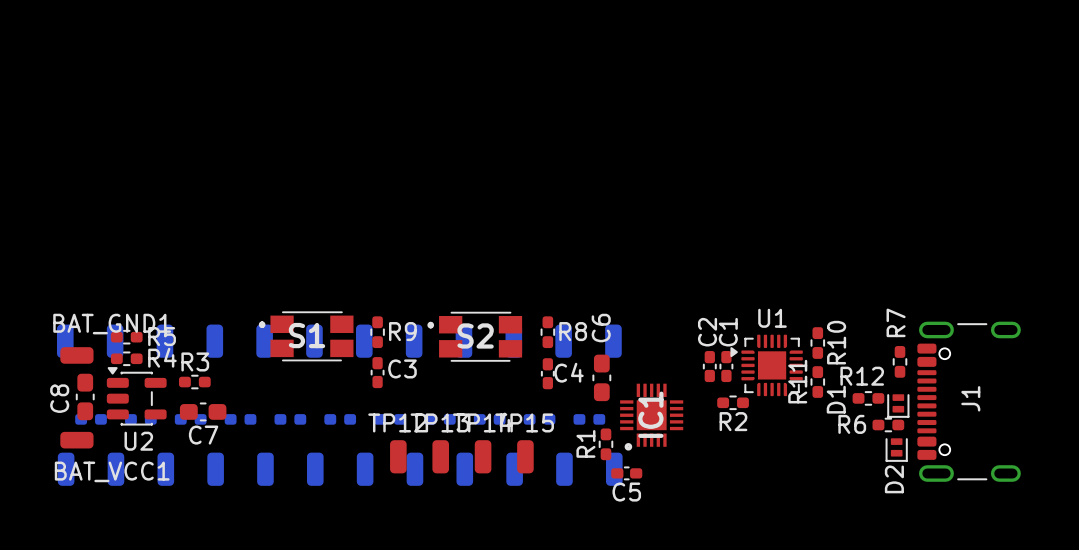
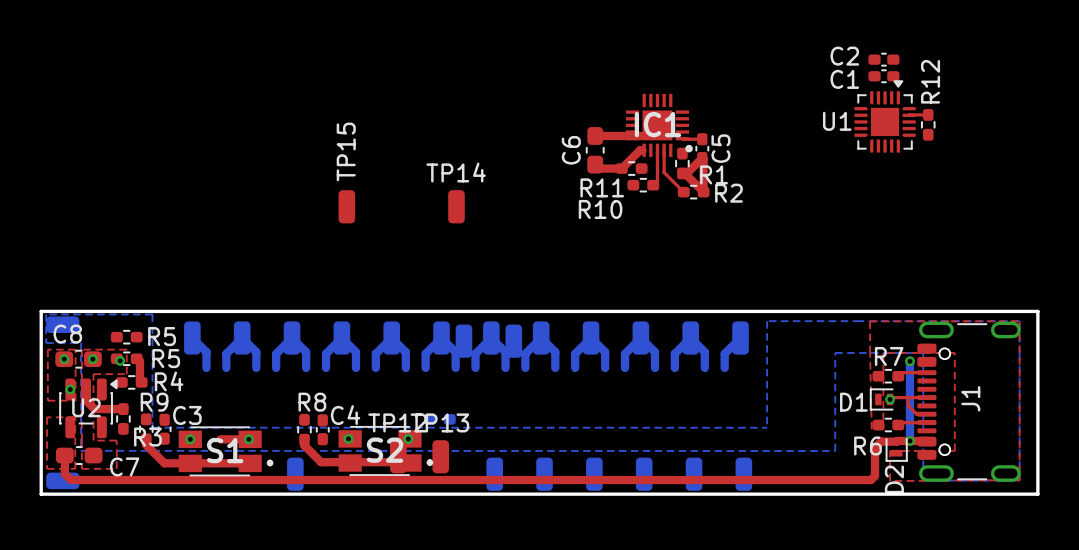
top track: none -> (928, 114) (909, 115)
top track: none -> (657, 125) (646, 135) (595, 135)
top track: none -> (682, 138) (702, 139)
top track: none -> (642, 150) (640, 150) (621, 168) (599, 168) (595, 164)
top track: none -> (657, 150) (657, 180) (653, 185) (656, 188)
top track: none -> (664, 150) (664, 172) (683, 192)
top track: none -> (682, 173) (686, 173) (702, 158) (703, 192) (684, 173)
board edge: none -> (41, 311) (1037, 311) (1037, 494) (41, 494) (41, 311)
bottom zone outline: none -> (46, 314) (152, 314) (152, 427) (767, 427) (767, 321) (1019, 321) (1019, 480) (923, 480) (923, 352) (835, 352) (835, 451) (81, 450) (81, 342) (46, 342) (46, 314)
U1 name position: U1 (772, 318) -> U1 (837, 121)
top zone outline: none -> (870, 321) (871, 429) (883, 429) (883, 352) (954, 352) (954, 450) (890, 450) (890, 481) (1019, 480) (1019, 321) (870, 321)
C6 name position: C6 (601, 328) -> C6 (571, 150)
R9 name position: R9 (402, 331) -> R9 (154, 402)
R8 name position: R8 (573, 331) -> R8 (312, 402)
R9 position: (377, 332) -> (146, 429)
R8 position: (547, 332) -> (304, 429)
C2 name position: C2 (707, 332) -> C2 (844, 56)
C1 name position: C1 (728, 332) -> C1 (844, 79)
S1 rotation: 0° (306, 336) -> 180° (226, 451)
S1 position: (306, 336) -> (226, 451)
S2 rotation: 0° (474, 336) -> 180° (385, 450)
S2 position: (474, 336) -> (385, 450)
bottom track: none -> (192, 338) (206, 352) (206, 367)
part: none -> (192, 338)
part: none -> (242, 338)
part: none -> (292, 338)
part: none -> (341, 338)
part: none -> (391, 338)
part: none -> (441, 338)
part: none -> (491, 338)
part: none -> (541, 338)
part: none -> (591, 338)
part: none -> (640, 338)
part: none -> (690, 338)
bottom track: none -> (740, 338) (724, 353) (724, 367)
part: none -> (740, 338)
part: (65, 341) -> none
part: (115, 341) -> none
part: (164, 341) -> none
part: (214, 341) -> none
part: (264, 341) -> none
part: (314, 341) -> none
part: (364, 341) -> none
part: (414, 341) -> none
part: (563, 341) -> none
part: (613, 341) -> none
R10 name position: R10 (836, 342) -> R10 (600, 209)
R10 rotation: 0° (817, 343) -> 90° clockwise (643, 185)
R10 position: (817, 343) -> (643, 185)
top zone outline: none -> (47, 349) (75, 349) (75, 400) (47, 400) (47, 349)
top zone outline: none -> (81, 349) (126, 349) (126, 374) (93, 374) (93, 440) (116, 440) (116, 468) (81, 468) (81, 349)
BAT_GND1 side: top (76, 355) -> bottom (62, 324)
R4 name: R4 (162, 357) -> R5 (166, 358)
via: none -> (64, 359)
via: none -> (92, 359)
via: none -> (120, 360)
top track: none -> (140, 360) (140, 380) (141, 382)
R7 rotation: 0° (900, 361) -> 90° clockwise (888, 376)
bottom track: none -> (909, 361) (909, 441)
via: none -> (909, 361)
U1 rotation: 0° (766, 365) -> 90° clockwise (885, 116)
U1 position: (766, 365) -> (885, 116)
C2 rotation: 0° (709, 366) -> 90° clockwise (883, 59)
C2 position: (709, 366) -> (883, 59)
C1 rotation: 0° (726, 366) -> 90° clockwise (883, 76)
C1 position: (726, 366) -> (883, 76)
bottom track: none -> (226, 367) (226, 353) (242, 338) (256, 352) (256, 367)
bottom track: none -> (276, 367) (276, 353) (292, 338) (306, 352) (306, 367)
bottom track: none -> (326, 367) (326, 353) (341, 338) (355, 352) (355, 367)
bottom track: none -> (375, 367) (375, 353) (391, 338) (405, 352) (405, 367)
bottom track: none -> (425, 367) (425, 353) (441, 338) (455, 352) (455, 367)
bottom track: none -> (475, 367) (475, 353) (491, 338) (505, 352) (505, 367)
bottom track: none -> (525, 367) (525, 353) (541, 338) (555, 352) (555, 367)
bottom track: none -> (575, 367) (575, 353) (591, 338) (605, 352) (605, 367)
bottom track: none -> (625, 367) (625, 353) (640, 338) (654, 352) (654, 367)
bottom track: none -> (674, 367) (674, 353) (690, 338) (704, 352) (704, 367)
C3 name position: C3 (402, 368) -> C3 (187, 415)
C3 position: (377, 372) -> (164, 429)
C4 name position: C4 (569, 372) -> C4 (345, 415)
top track: none -> (926, 372) (903, 372) (899, 376)
C4 position: (547, 373) -> (322, 429)
C6 position: (601, 377) -> (595, 150)
R4: none -> (131, 382)
R3 rotation: 0° (194, 382) -> 90° clockwise (123, 418)
R3 position: (194, 382) -> (123, 418)
R11 rotation: 0° (817, 382) -> 90° clockwise (631, 168)
R11 position: (817, 382) -> (631, 168)
via: none -> (70, 389)
top track: none -> (86, 389) (86, 400) (94, 409) (123, 409)
C8 rotation: 0° (85, 396) -> 90° clockwise (78, 359)
C8 position: (85, 396) -> (78, 359)
U2 rotation: 0° (136, 396) -> 90° clockwise (88, 408)
U2 position: (136, 396) -> (88, 408)
top track: none -> (908, 397) (908, 405) (916, 414) (926, 414)
top track: none -> (926, 397) (891, 397) (890, 399)
R12 rotation: 0° (868, 398) -> 90° clockwise (928, 124)
R12 position: (868, 398) -> (928, 124)
D1 name position: D1 (836, 399) -> D1 (853, 402)
via: none -> (890, 399)
R2 position: (733, 402) -> (693, 192)
D1 rotation: 0° (898, 405) -> 90° clockwise (881, 399)
D1 position: (898, 405) -> (881, 399)
C7 position: (203, 411) -> (79, 455)
top zone outline: none -> (47, 417) (75, 417) (75, 468) (47, 468) (47, 417)
IC1 rotation: 0° (651, 417) -> 90° counterclockwise (659, 125)
IC1 position: (651, 417) -> (659, 125)
part: (91, 419) -> none
part: (140, 419) -> none
part: (190, 419) -> none
part: (240, 419) -> none
part: (290, 419) -> none
part: (340, 419) -> none
part: (390, 419) -> none
part: (489, 419) -> none
part: (539, 419) -> none
part: (589, 419) -> none
R2 name position: R2 (733, 421) -> R2 (728, 193)
TP15 name rotation: 0° (524, 422) -> 90° counterclockwise (346, 151)
top track: none -> (898, 422) (926, 422)
R6 name position: R6 (852, 424) -> R6 (868, 445)
C7 name position: C7 (203, 435) -> C7 (124, 466)
via: none -> (348, 438)
via: none -> (408, 438)
top track: none -> (146, 439) (146, 445) (164, 463) (250, 463)
via: none -> (190, 439)
top track: none -> (220, 439) (250, 439)
via: none -> (248, 439)
top track: none -> (304, 439) (304, 445) (321, 462) (409, 462)
BAT_VCC1: (76, 440) -> none
U2 name position: U2 (138, 441) -> U2 (86, 407)
via: none -> (909, 441)
top track: none -> (926, 441) (881, 441) (875, 447) (875, 475) (870, 480) (71, 480) (64, 473) (64, 455)
R1 name rotation: 0° (585, 443) -> 90° clockwise (714, 174)
R1 name position: R1 (585, 443) -> R1 (714, 174)
R1 position: (605, 444) -> (682, 163)
TP14 position: (483, 456) -> (456, 206)
TP15 position: (525, 456) -> (346, 206)
part rotation: 0° (66, 469) -> 90° clockwise (62, 480)
part: (115, 469) -> none
part: (165, 469) -> none
part: (215, 469) -> none
part: (265, 469) -> none
part: (315, 469) -> none
part: (365, 469) -> none
part: (414, 469) -> none
part: (464, 469) -> none
part: (514, 469) -> none
part: (564, 469) -> none
part: (614, 469) -> none
C5 rotation: 0° (626, 473) -> 90° clockwise (702, 148)
C5 position: (626, 473) -> (702, 148)
part: none -> (295, 474)
part: none -> (494, 474)
part: none -> (544, 474)
part: none -> (594, 474)
part: none -> (644, 474)
part: none -> (694, 474)
part: none -> (743, 474)

